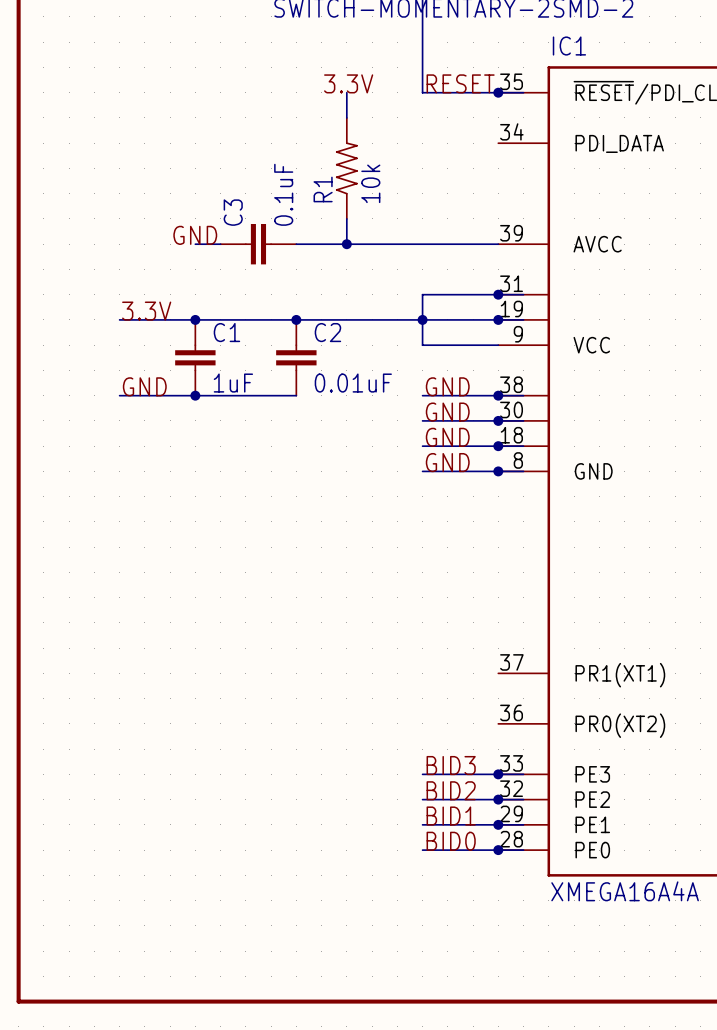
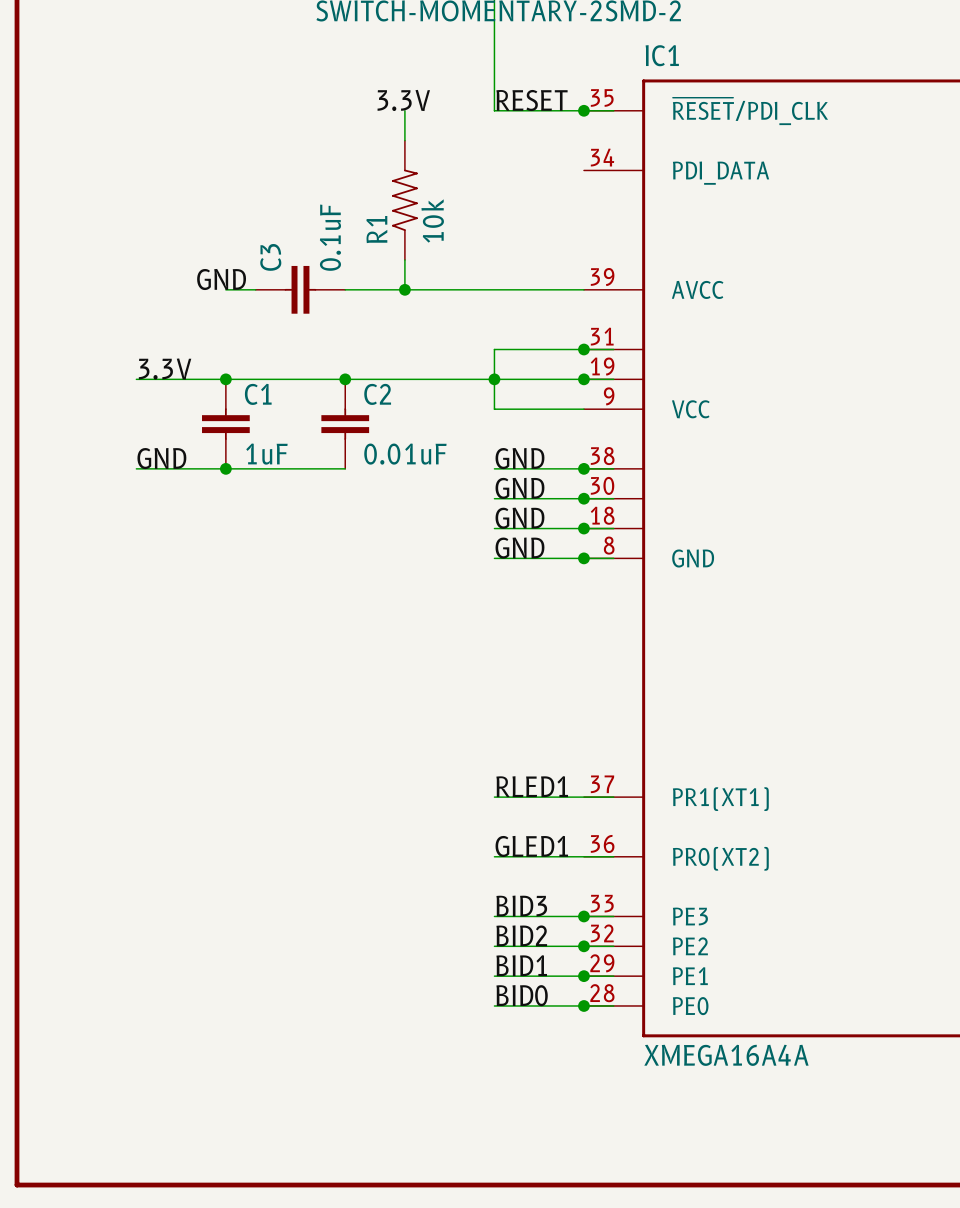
label: none -> RLED1 (532, 786)
wire: none -> (494, 797) (613, 797)
label: none -> GLED1 (531, 846)
wire: none -> (494, 856) (613, 856)

